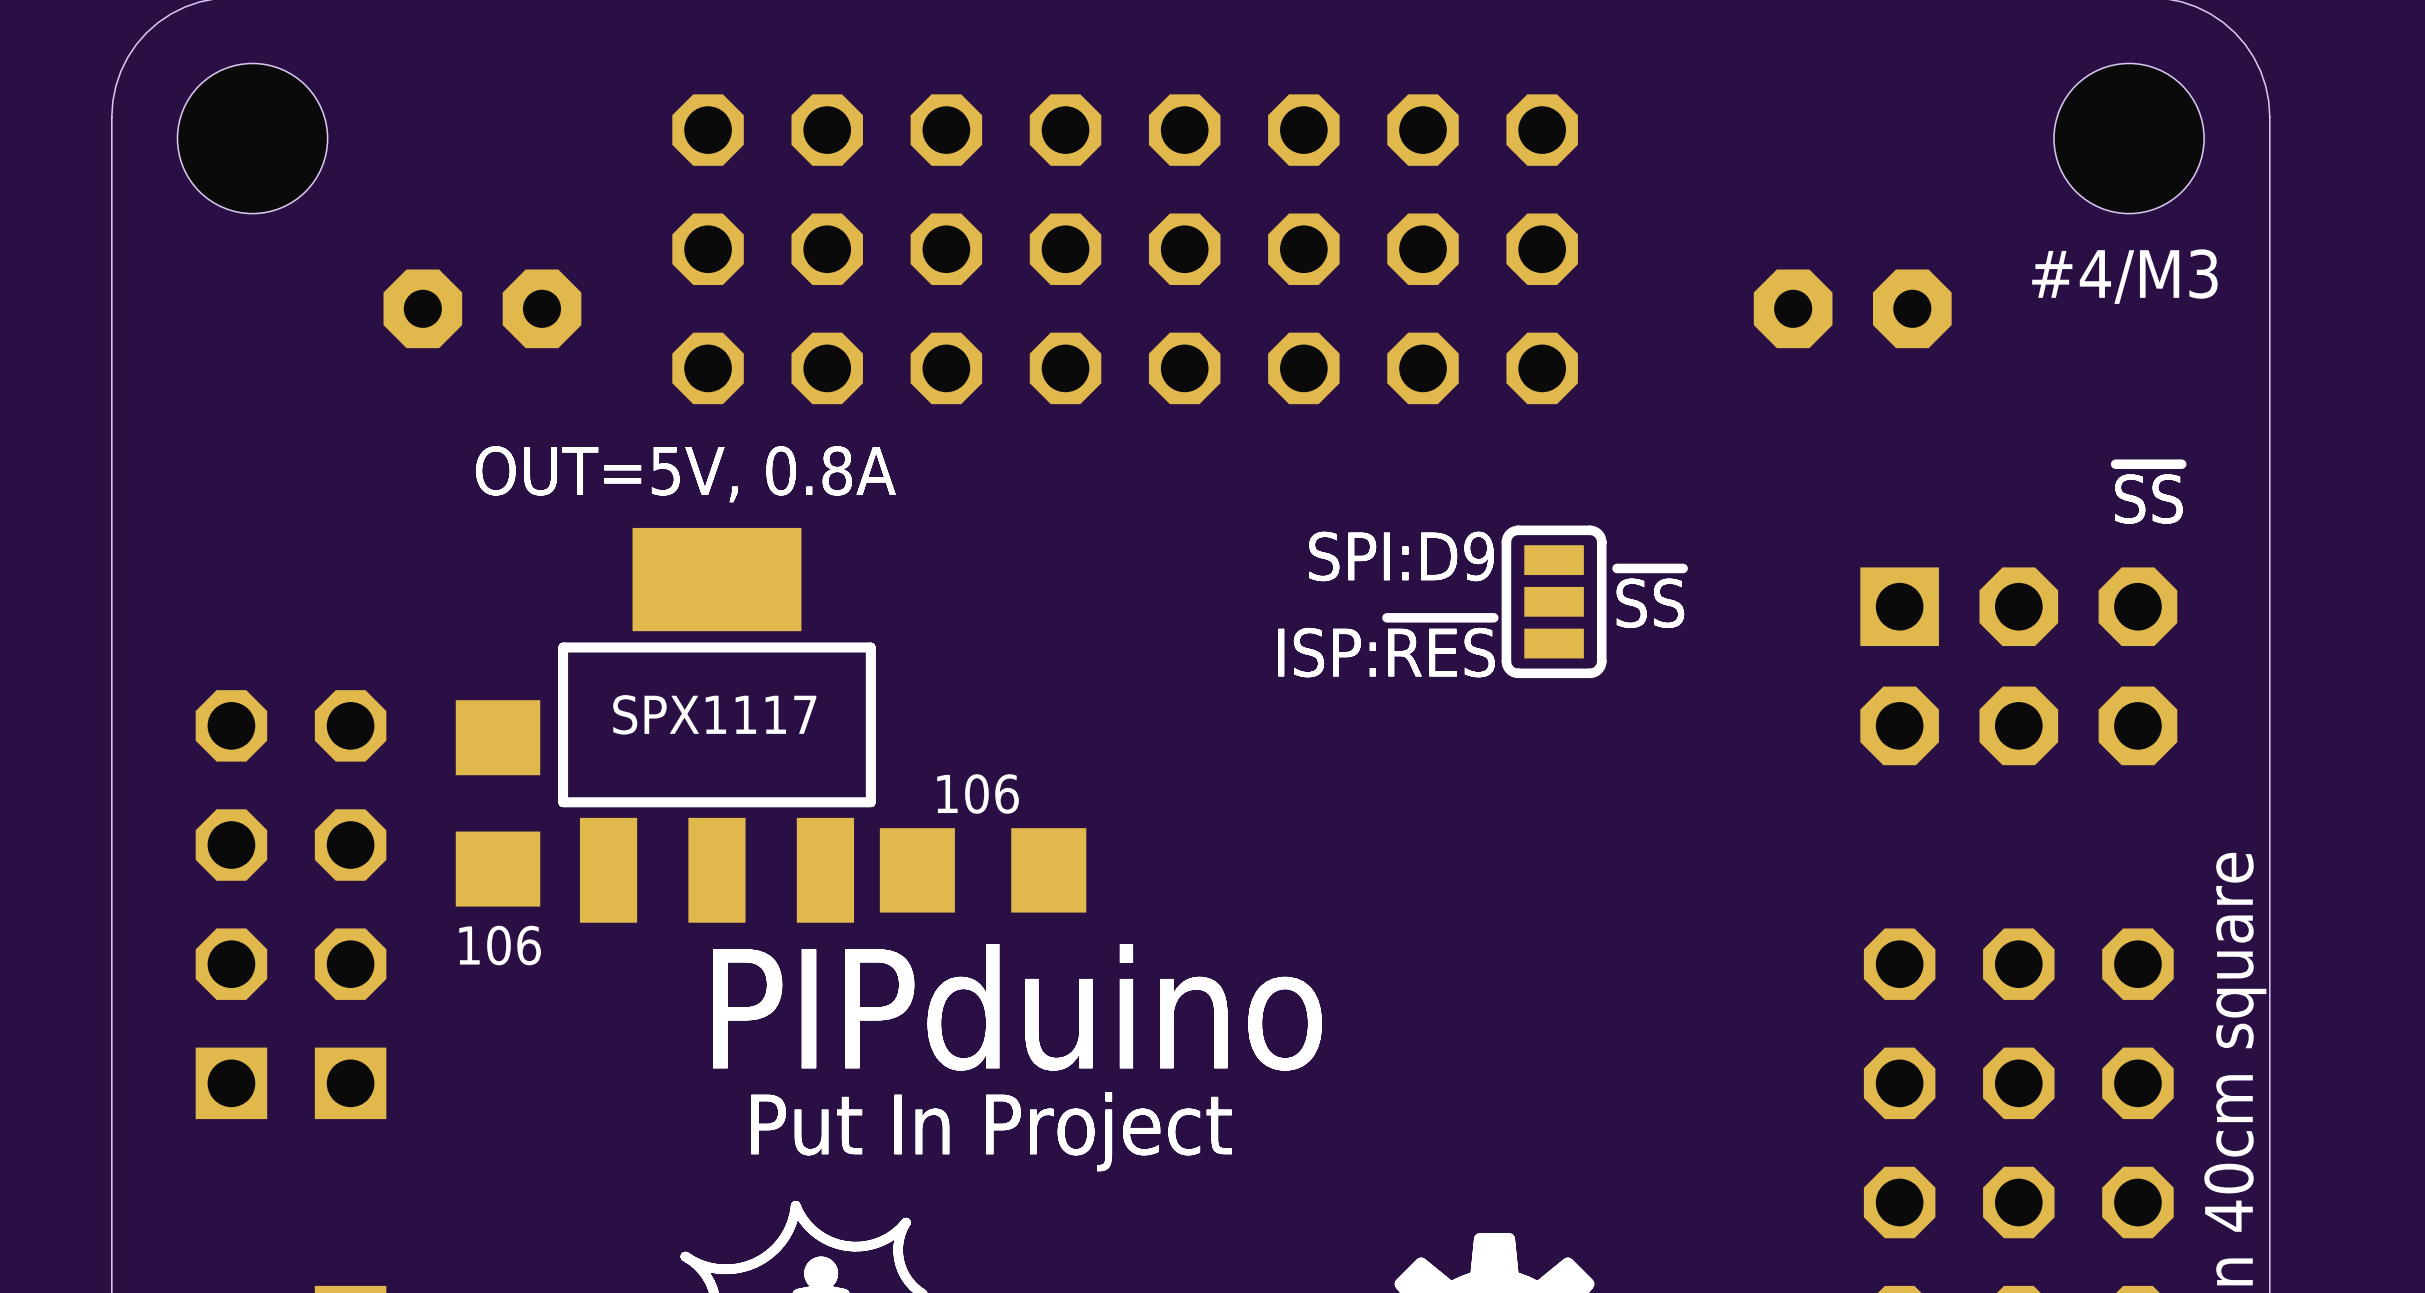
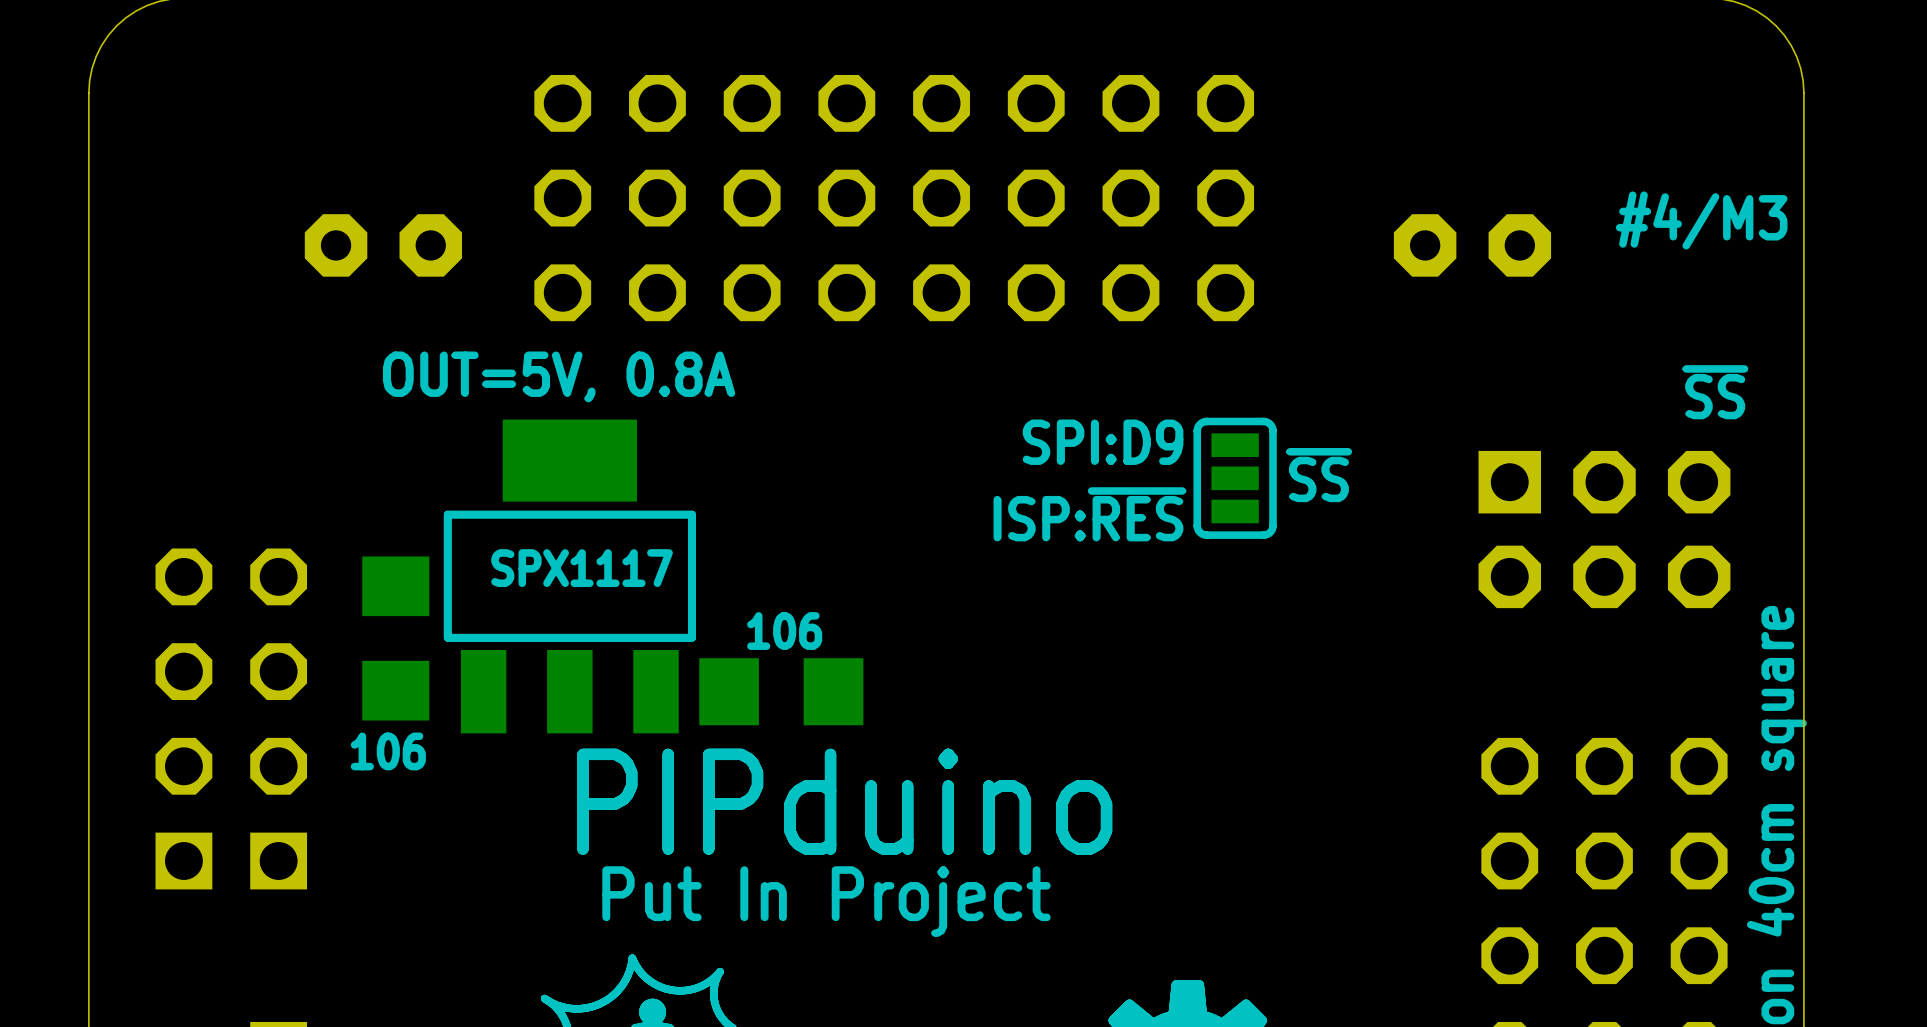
hole: (252, 138) -> none
hole: (2129, 138) -> none

